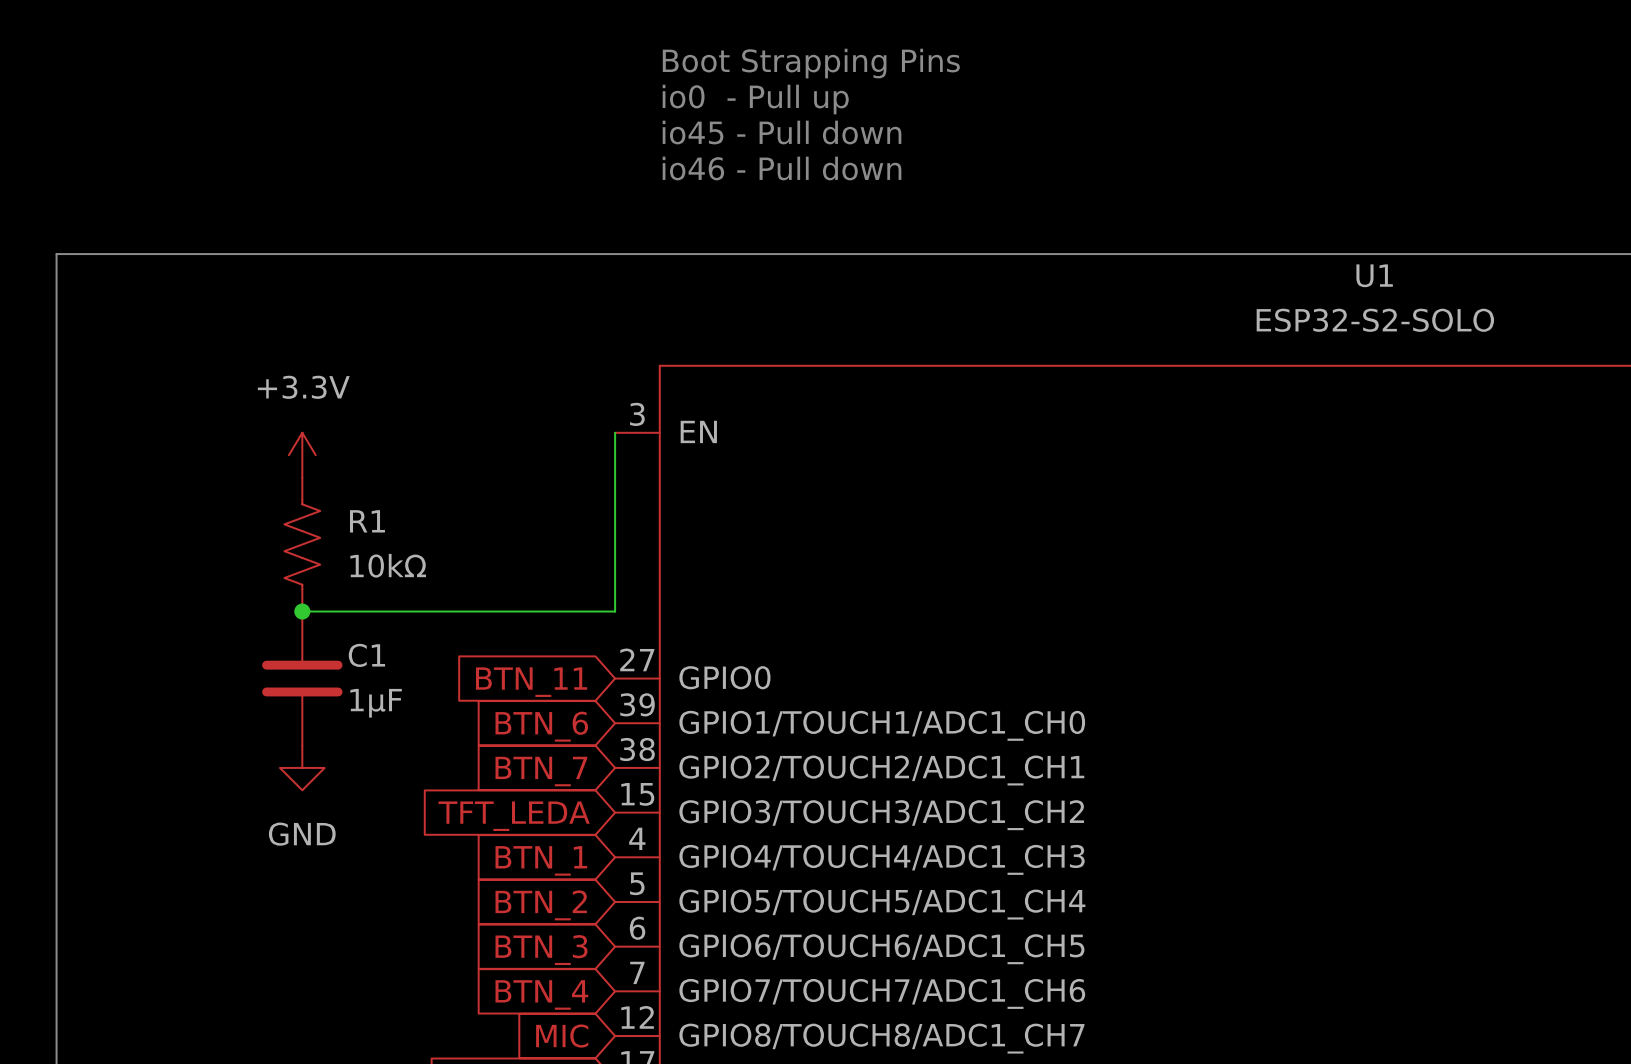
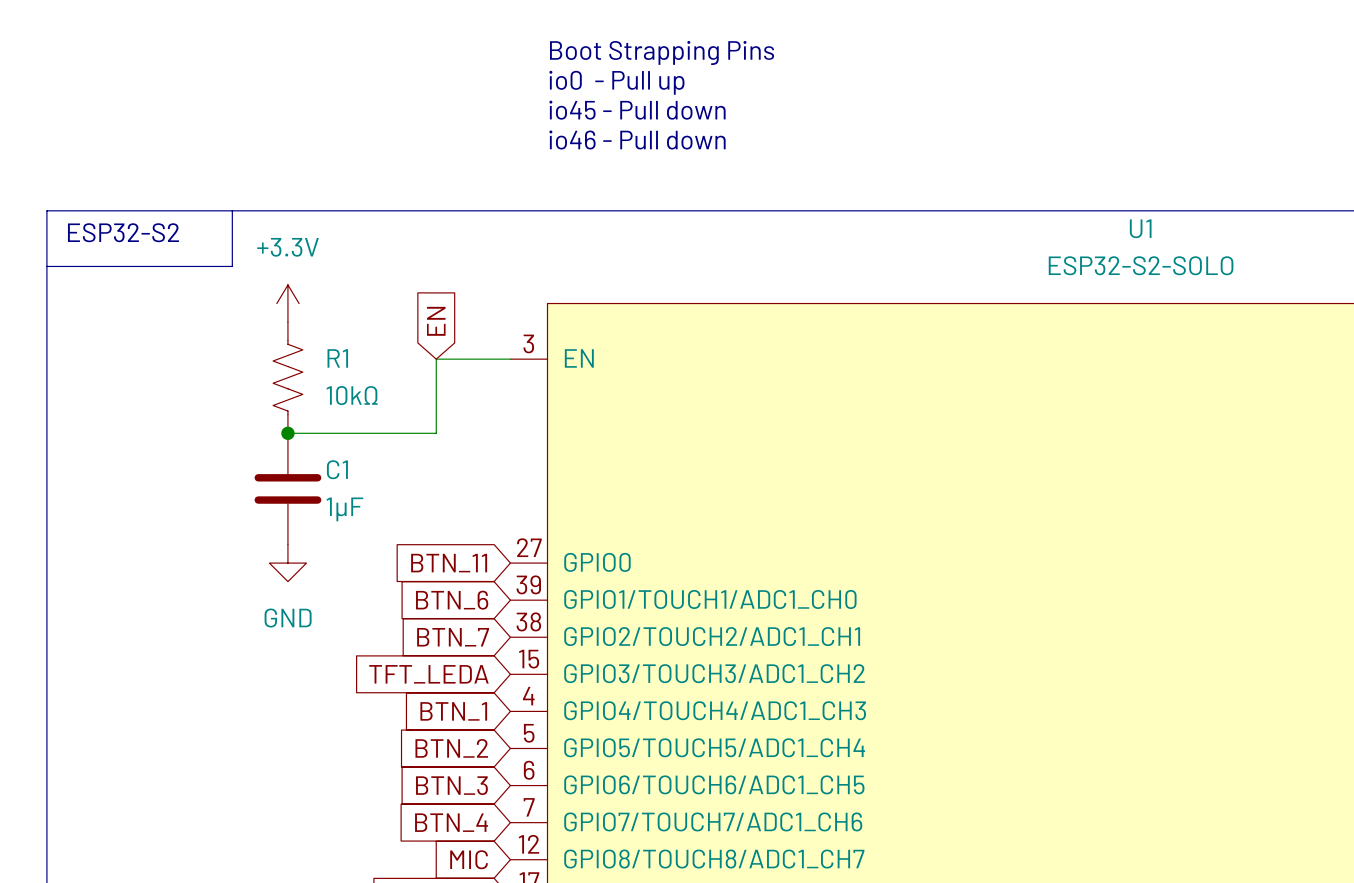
line: none -> (232, 210) (232, 266) (46, 266)
text: none -> ESP32-S2 (123, 232)
global label: none -> EN (436, 321)
wire: (615, 432) (615, 611) (302, 611) -> (510, 359) (436, 359) (436, 433) (287, 433)
power symbol position: +3.3V (302, 455) -> +3.3V (287, 303)
R1 position: (302, 544) -> (287, 377)
junction position: (302, 611) -> (287, 433)
C1 position: (302, 678) -> (287, 488)
power symbol position: GND (302, 767) -> GND (287, 563)

